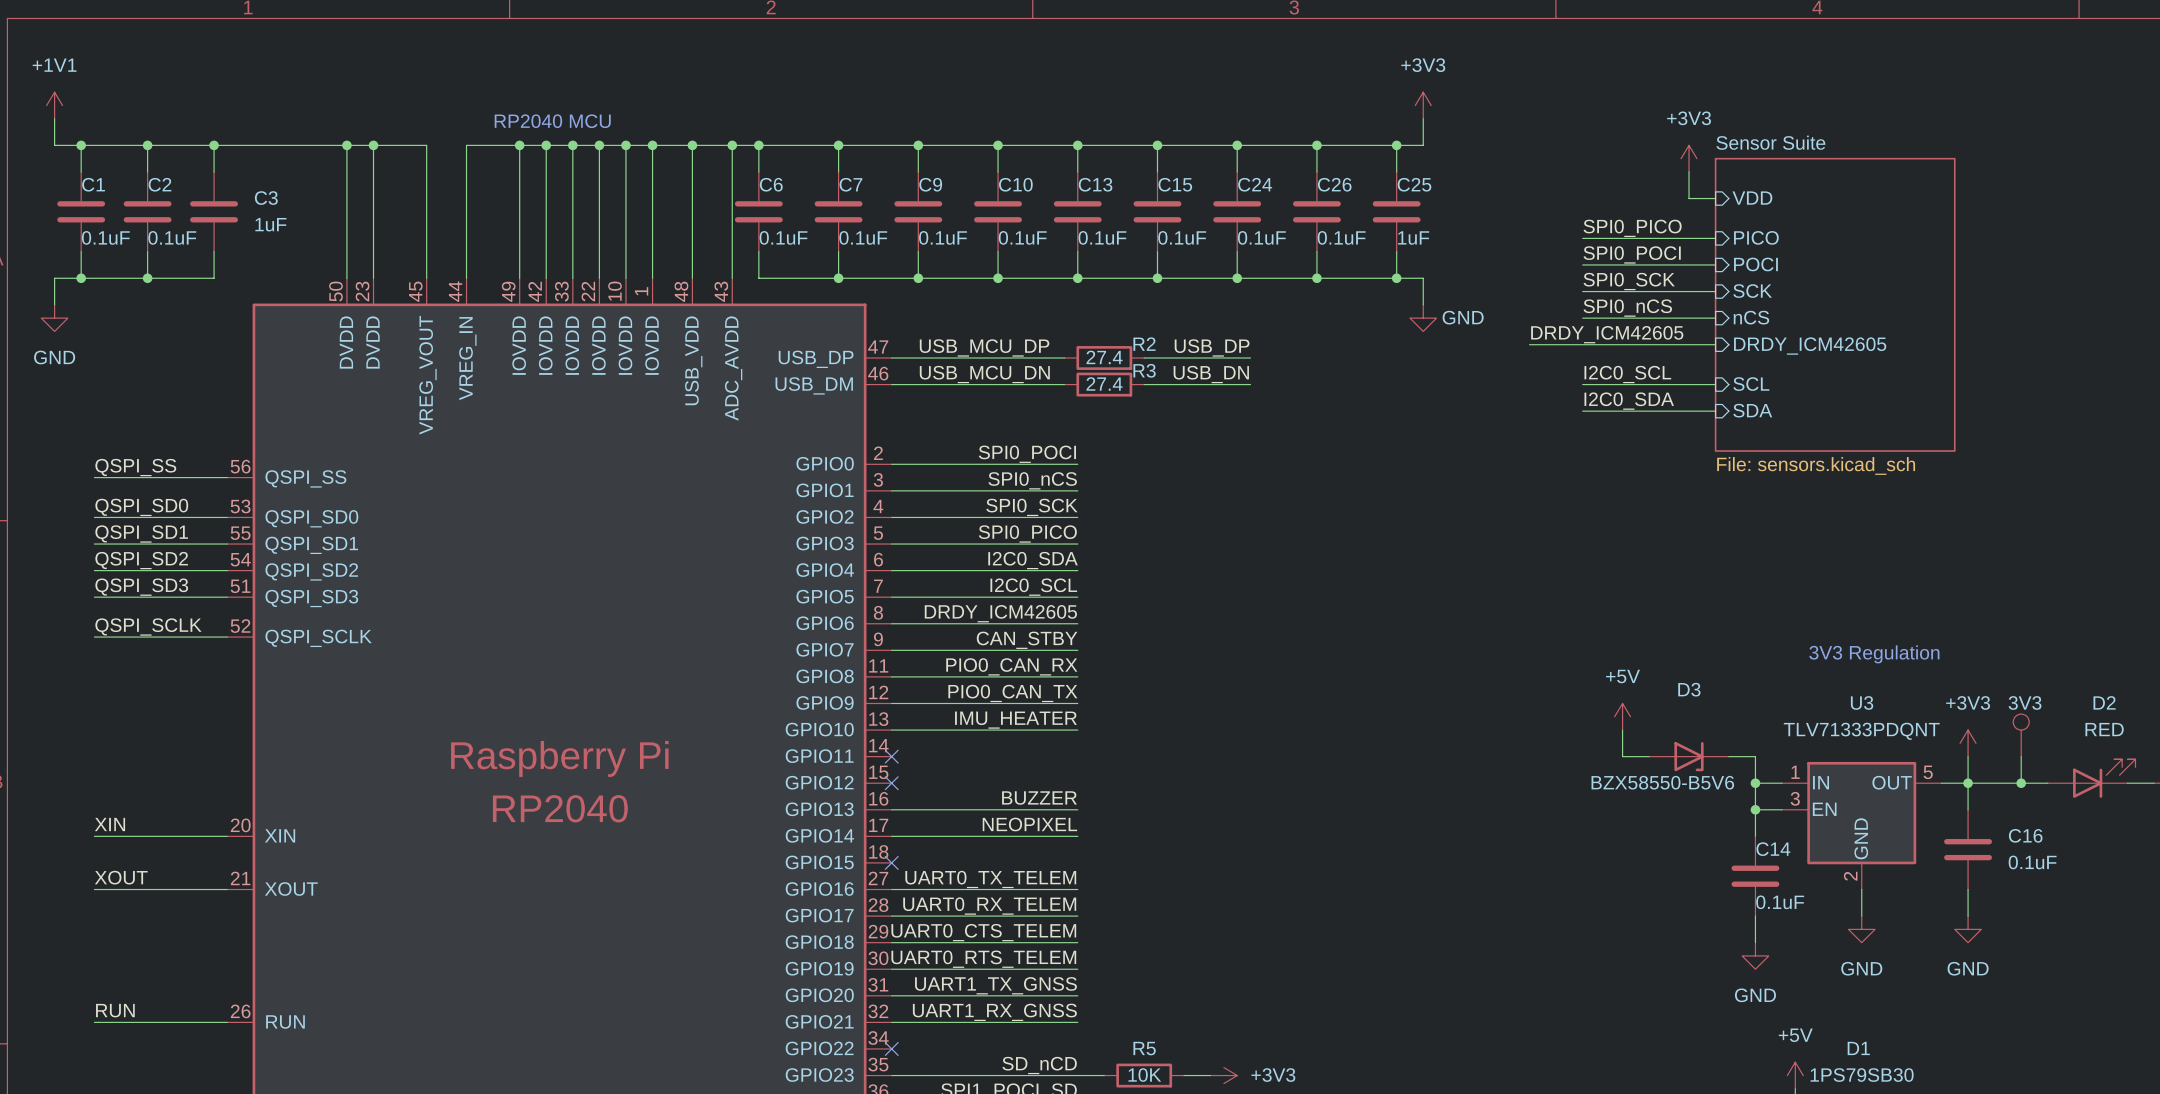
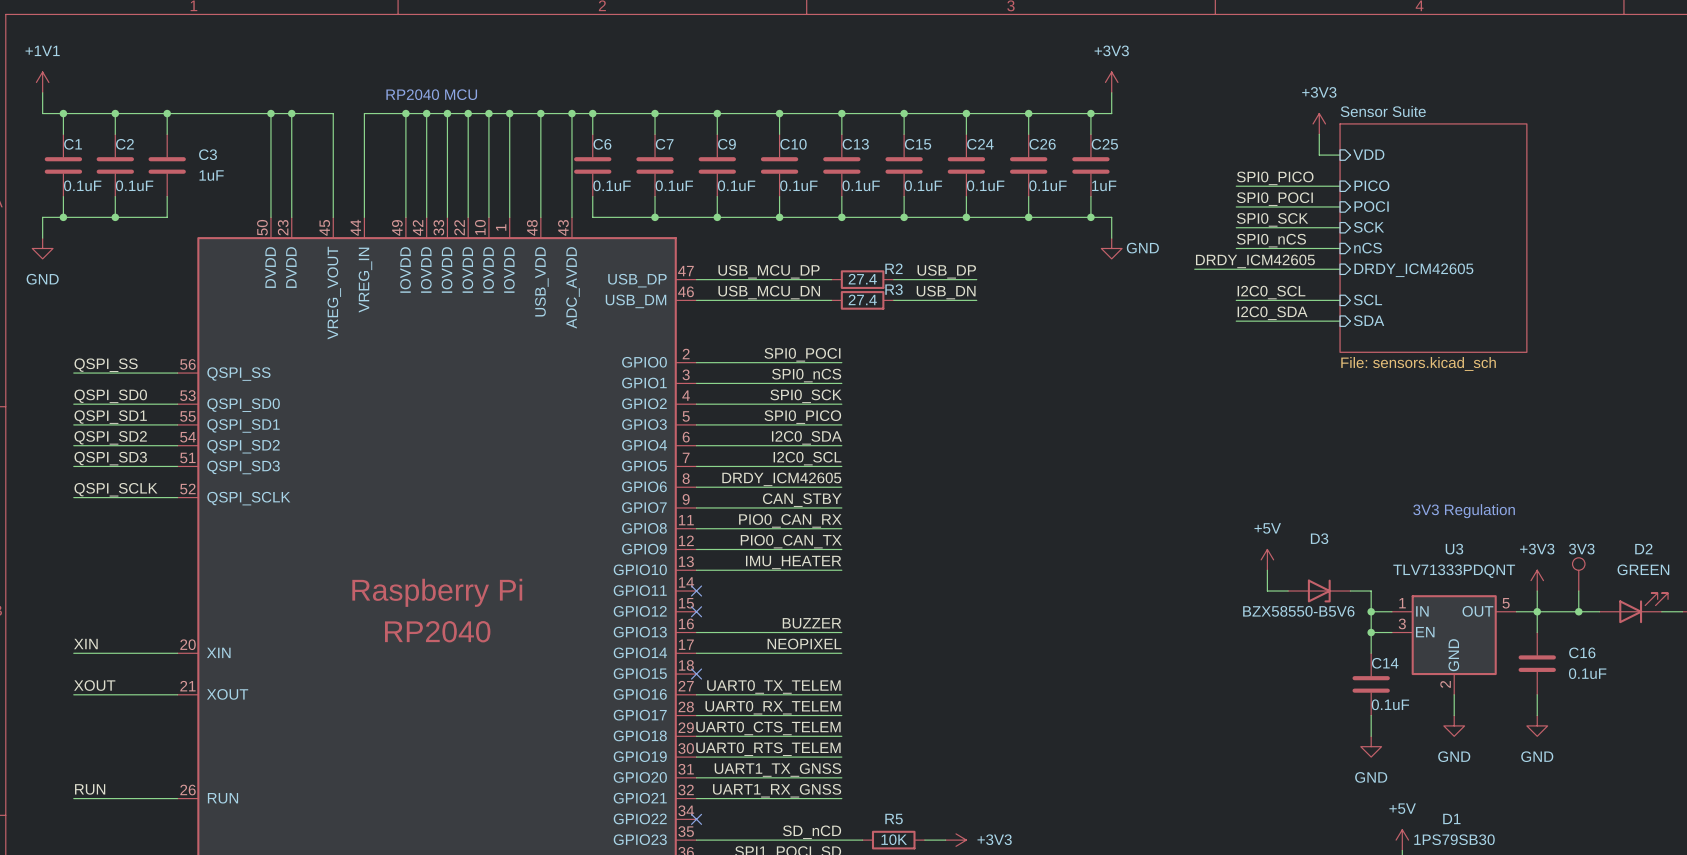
D2 value: RED (2104, 729) -> GREEN (1643, 569)

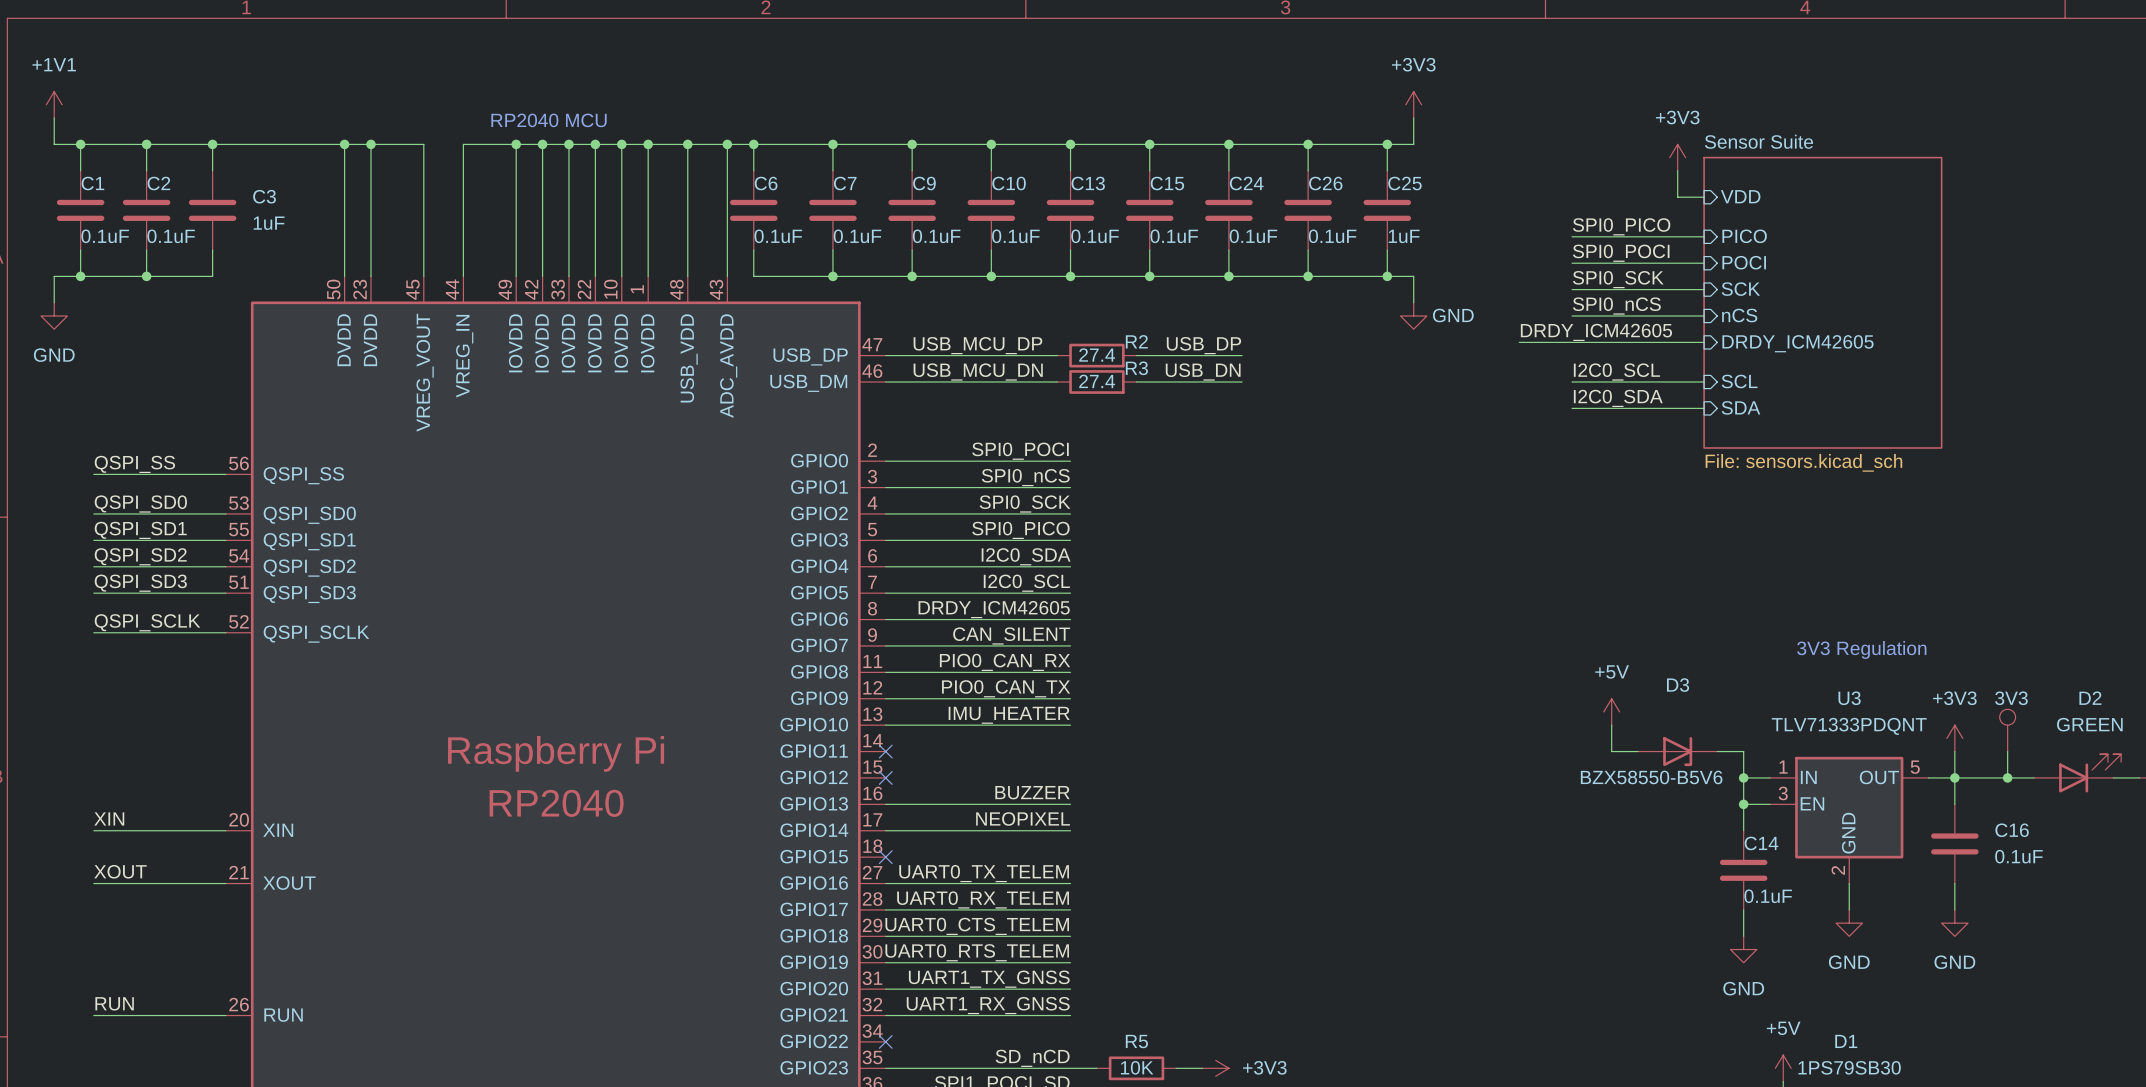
label: CAN_STBY (802, 500) -> CAN_SILENT (1011, 635)

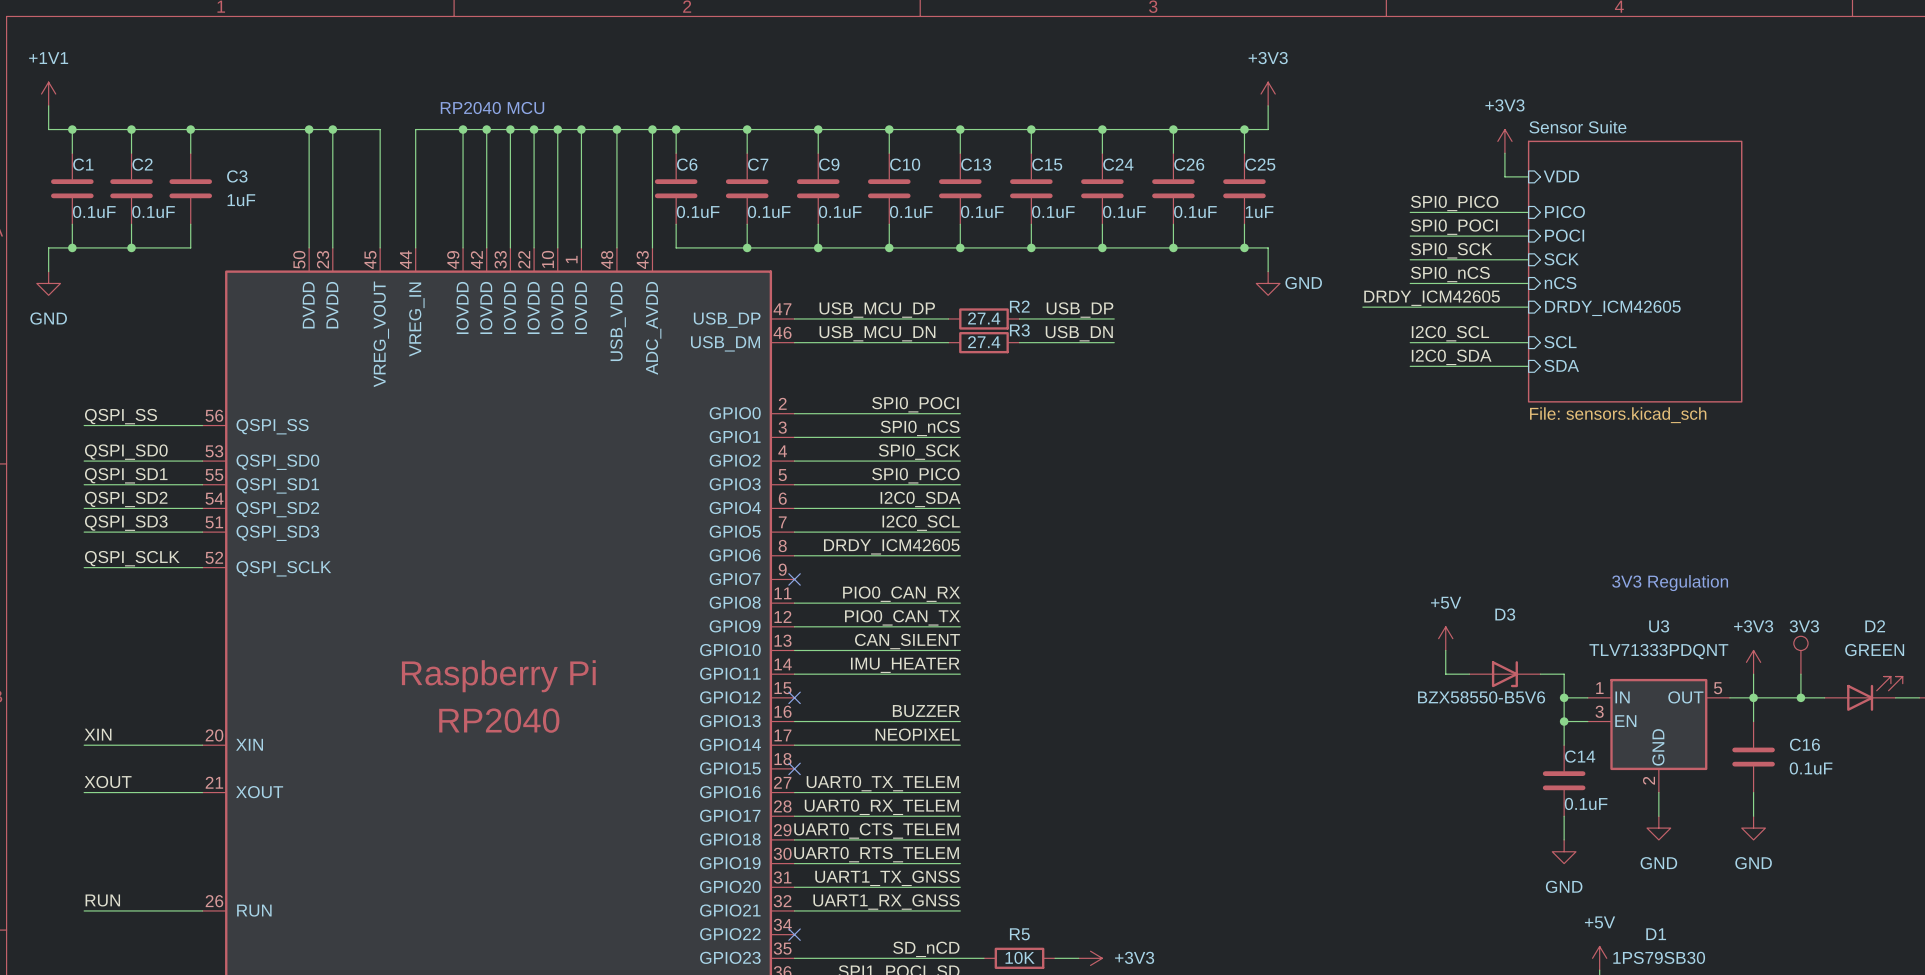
label: CAN_SILENT (1011, 635) -> none
wire: (885, 645) (1070, 645) -> (794, 674) (960, 674)
no-connect mark: none -> (794, 579)
label: IMU_HEATER (1009, 715) -> CAN_SILENT (907, 641)
label: none -> IMU_HEATER (905, 665)
no-connect mark: (885, 751) -> none

